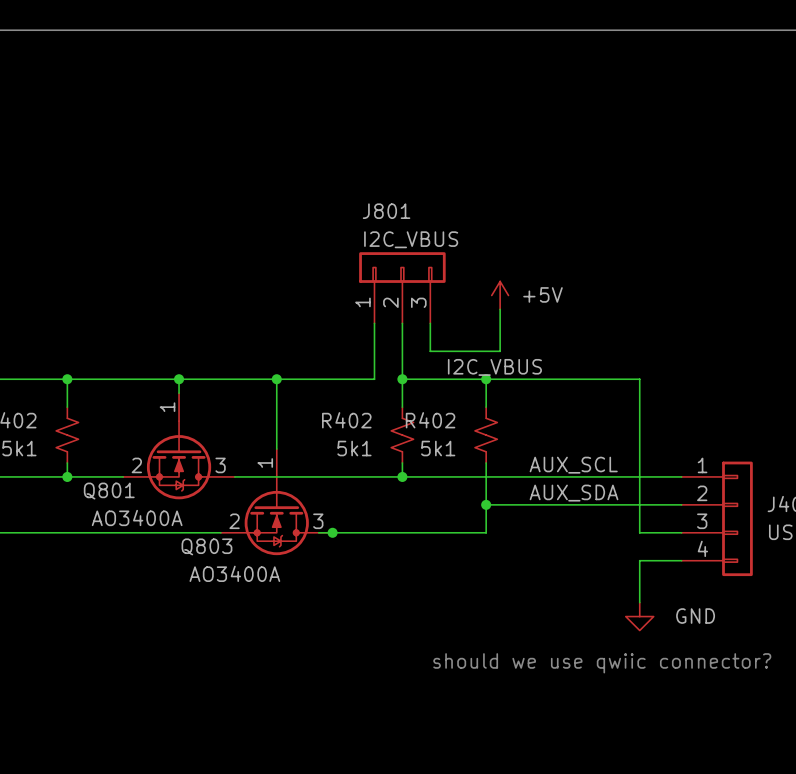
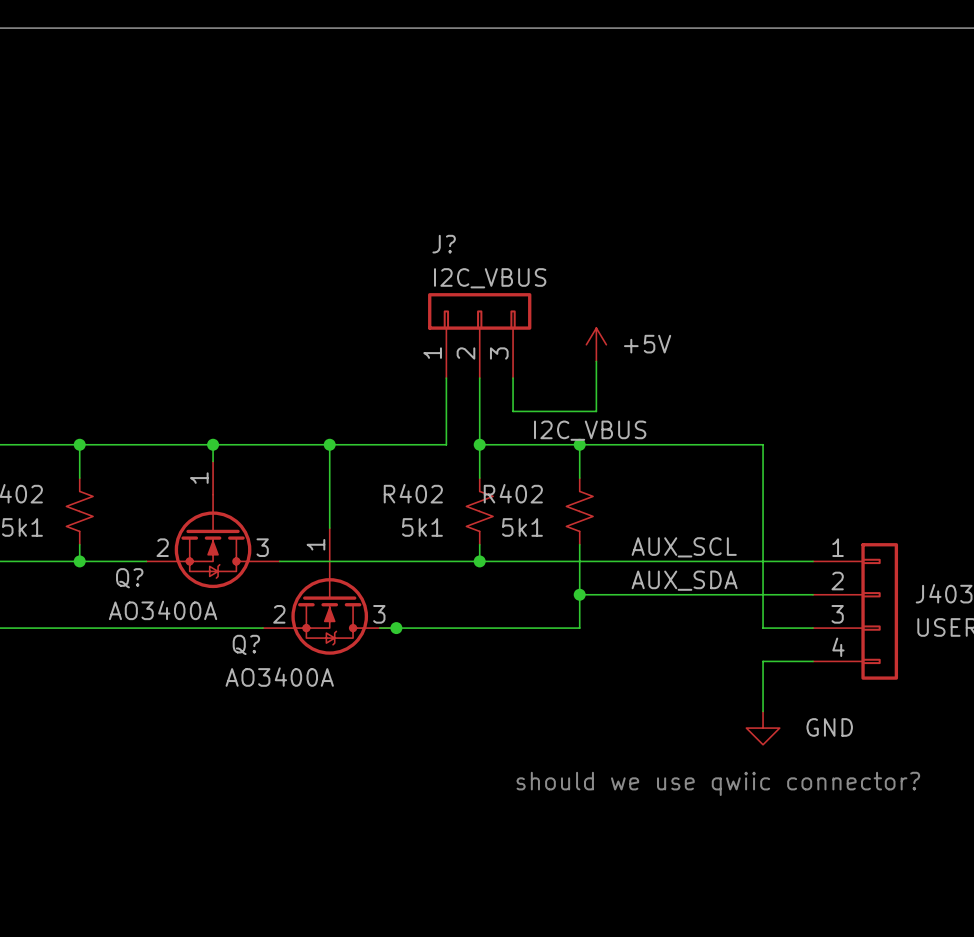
J801 name: J801 (386, 211) -> J? (444, 244)
Q801 name: Q801 (109, 491) -> Q? (129, 578)
Q803 name: Q803 (206, 546) -> Q? (246, 644)

